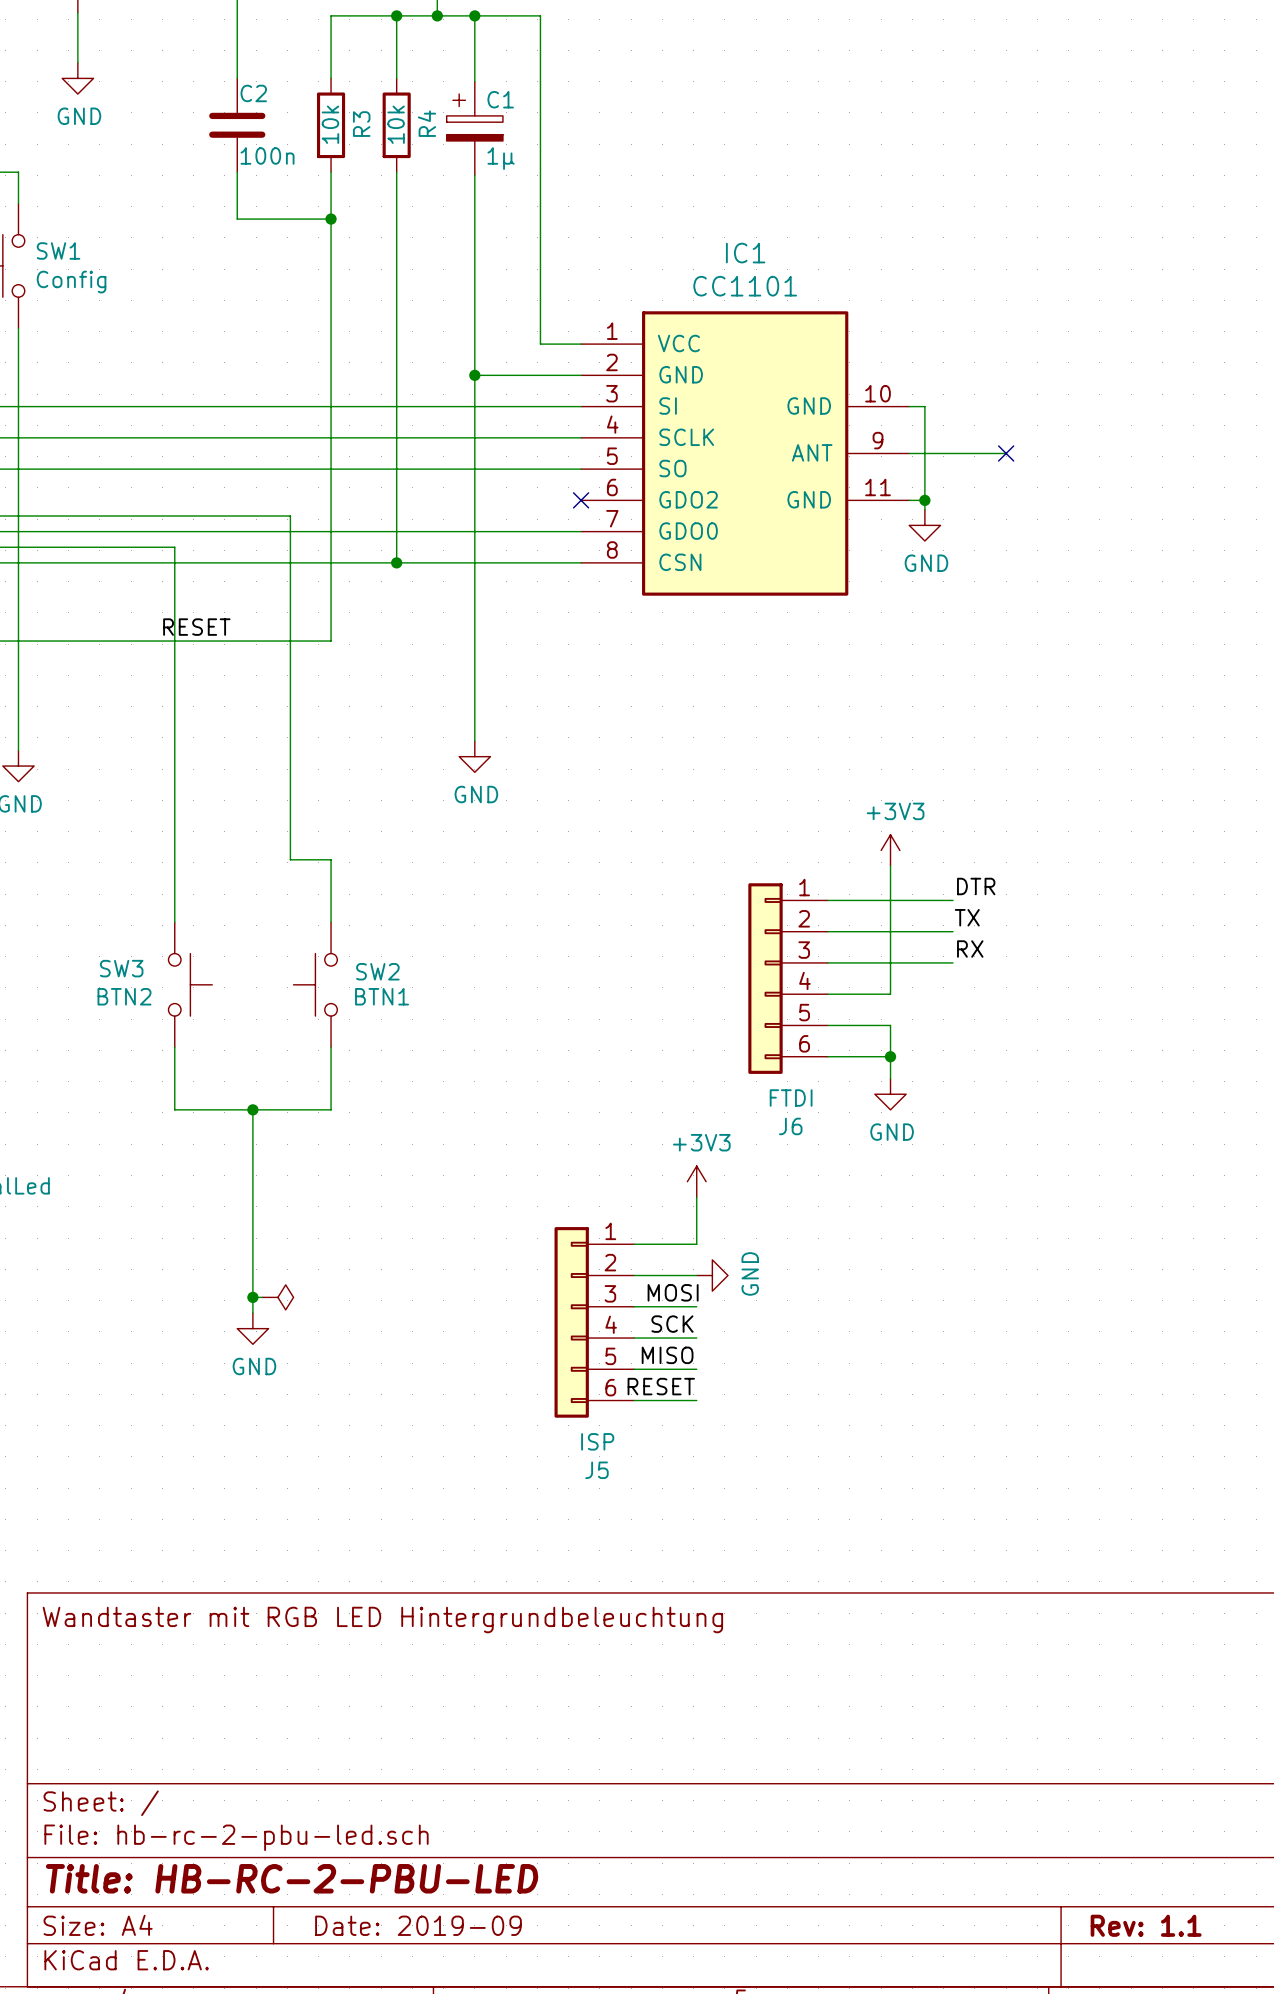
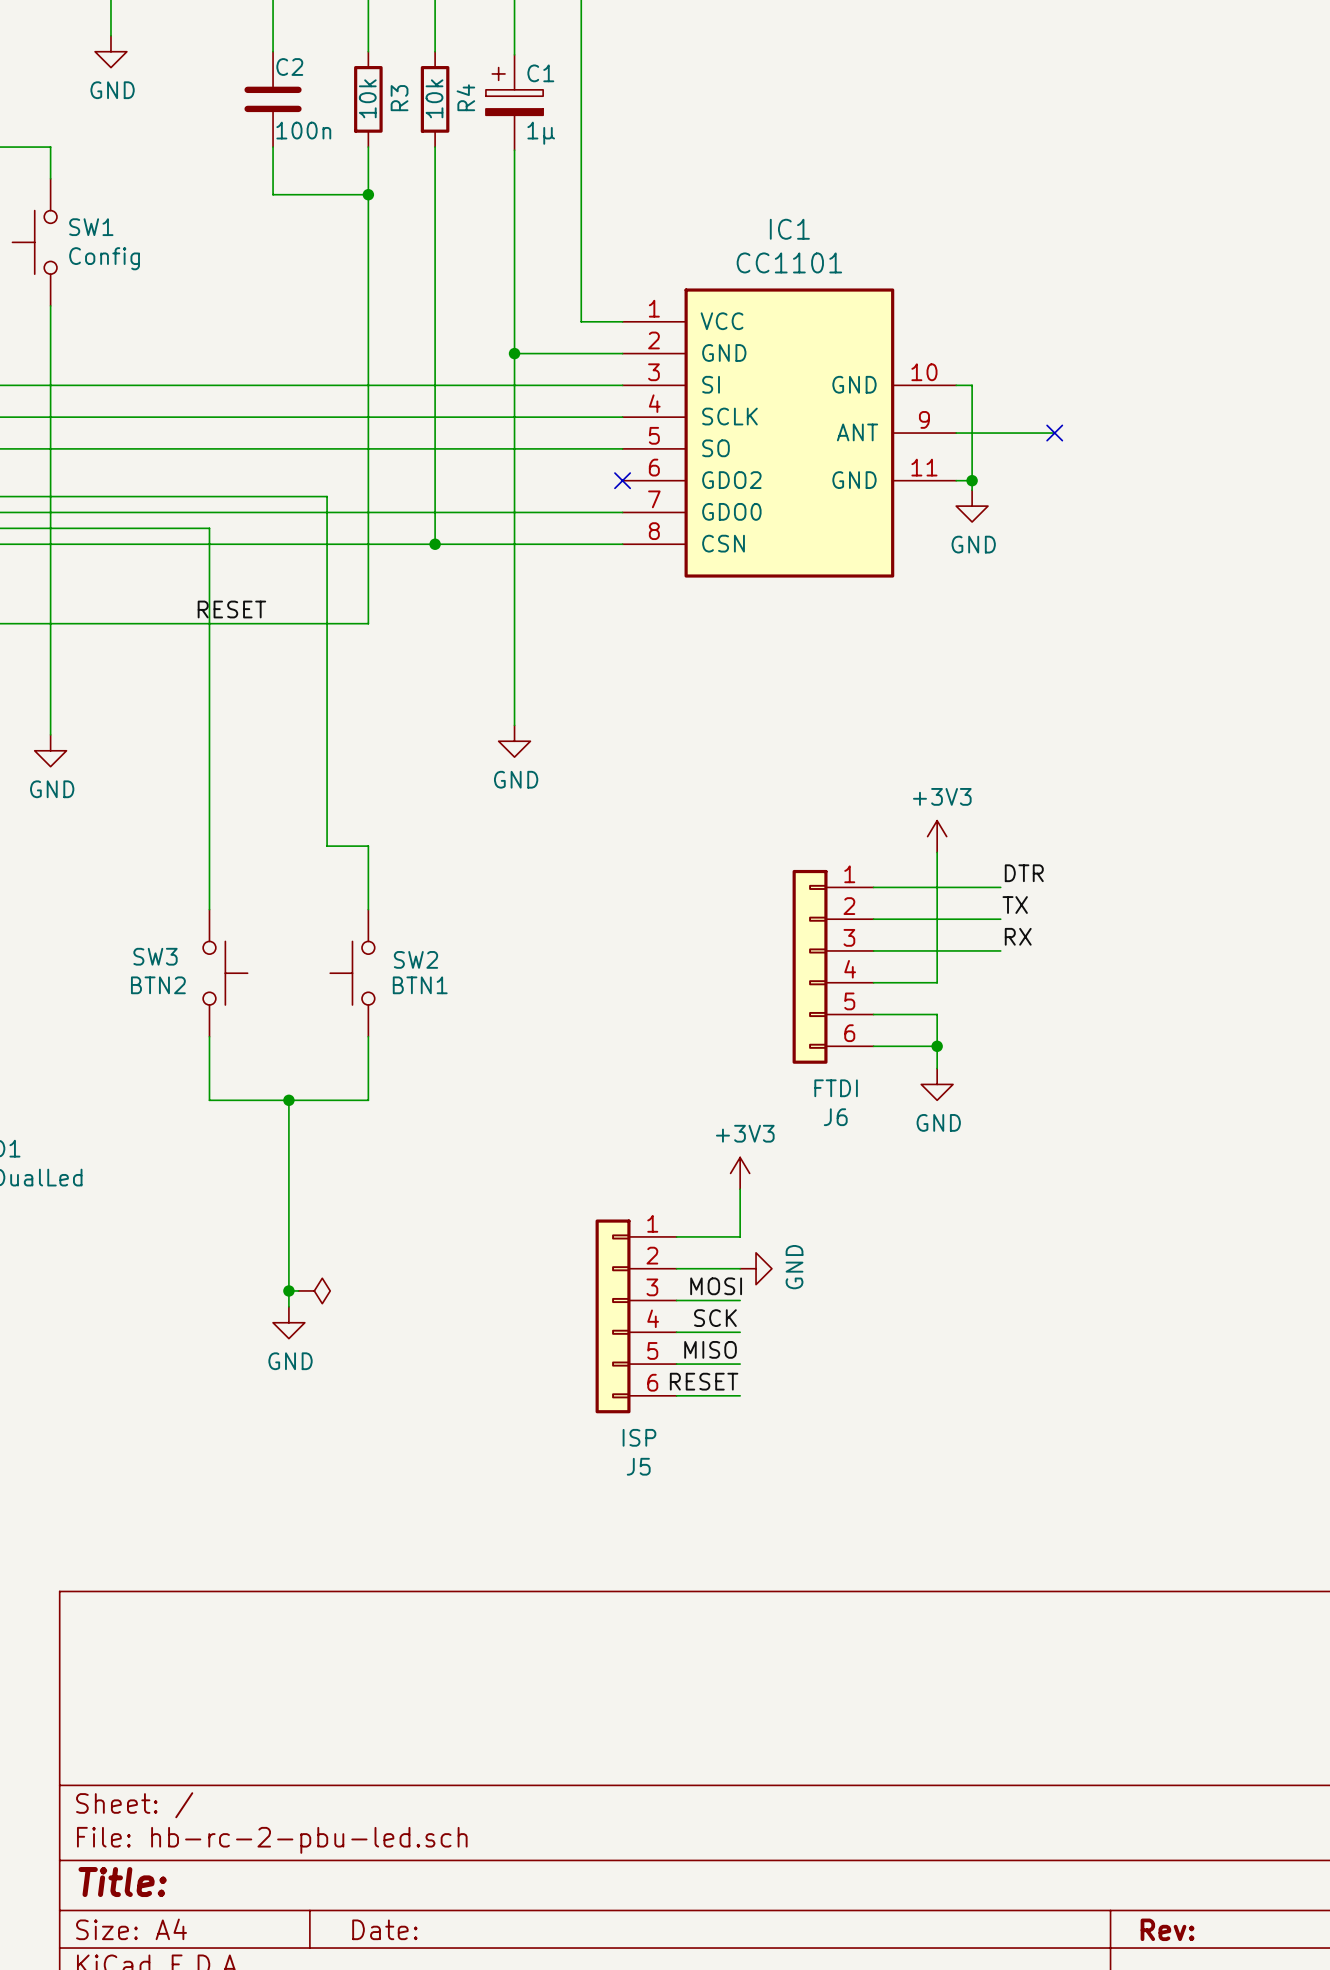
title block: Wandtaster mit RGB LED Hintergrundbeleuchtung (382, 1619) -> none
title block: Title: HB-RC-2-PBU-LED (292, 1878) -> Title: (122, 1882)
title block: Date: 2019-09 (418, 1925) -> Date: (384, 1929)
title block: Rev: 1.1 (1146, 1925) -> Rev: (1167, 1929)

